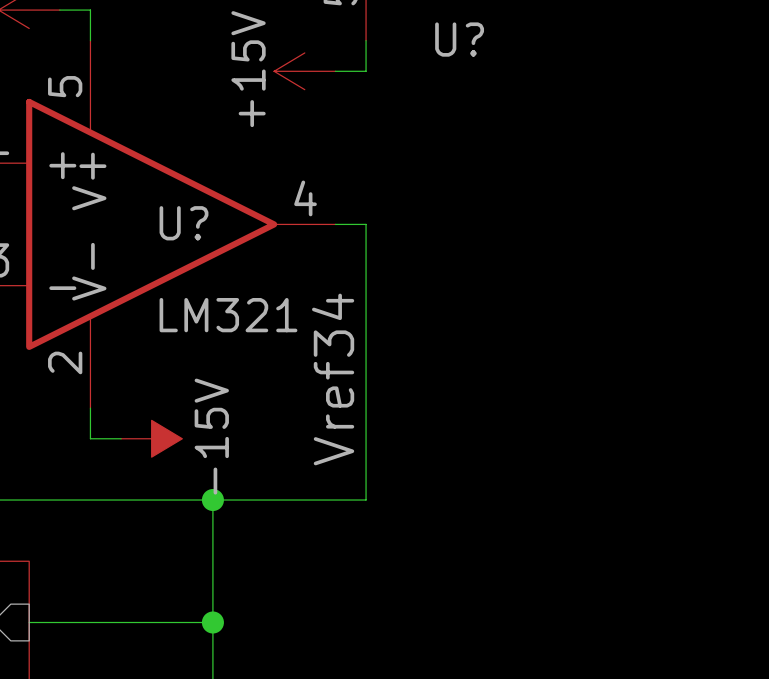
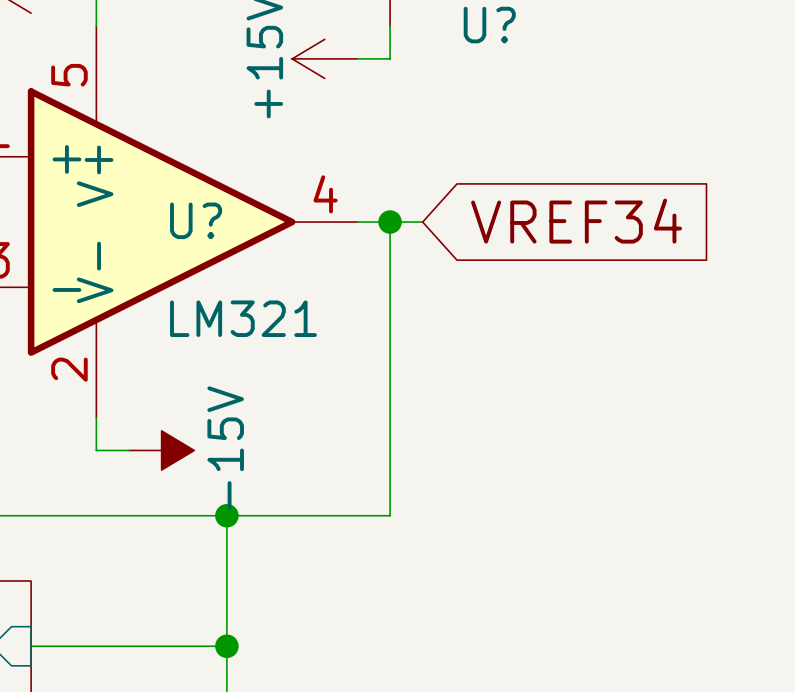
global label: none -> VREF34 (576, 221)
wire: none -> (390, 222) (422, 222)
junction: none -> (390, 222)
label: Vref34 (333, 379) -> none

